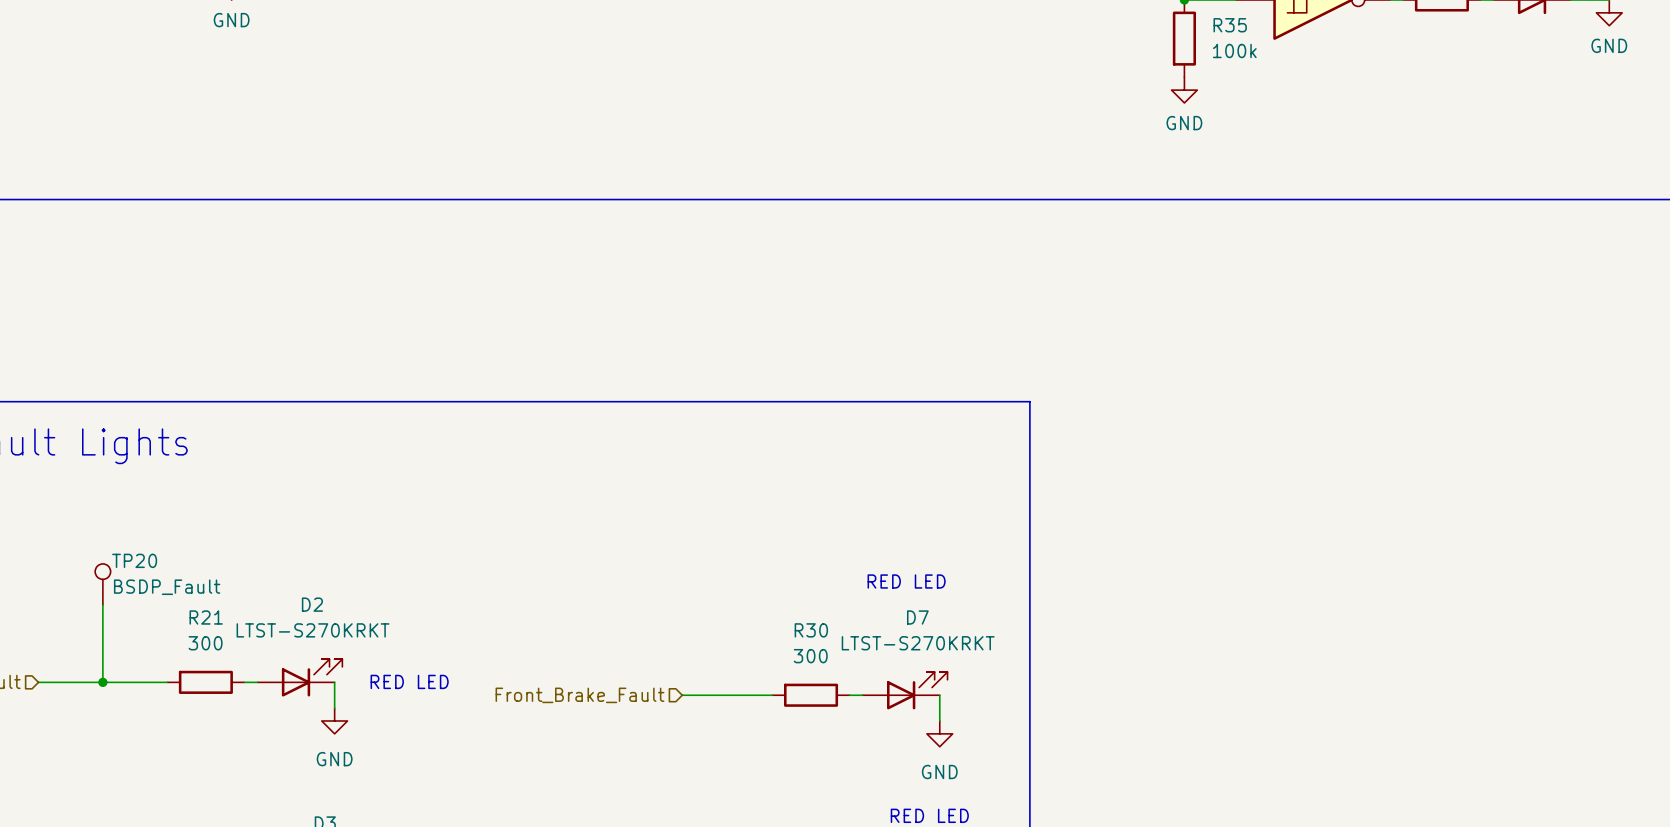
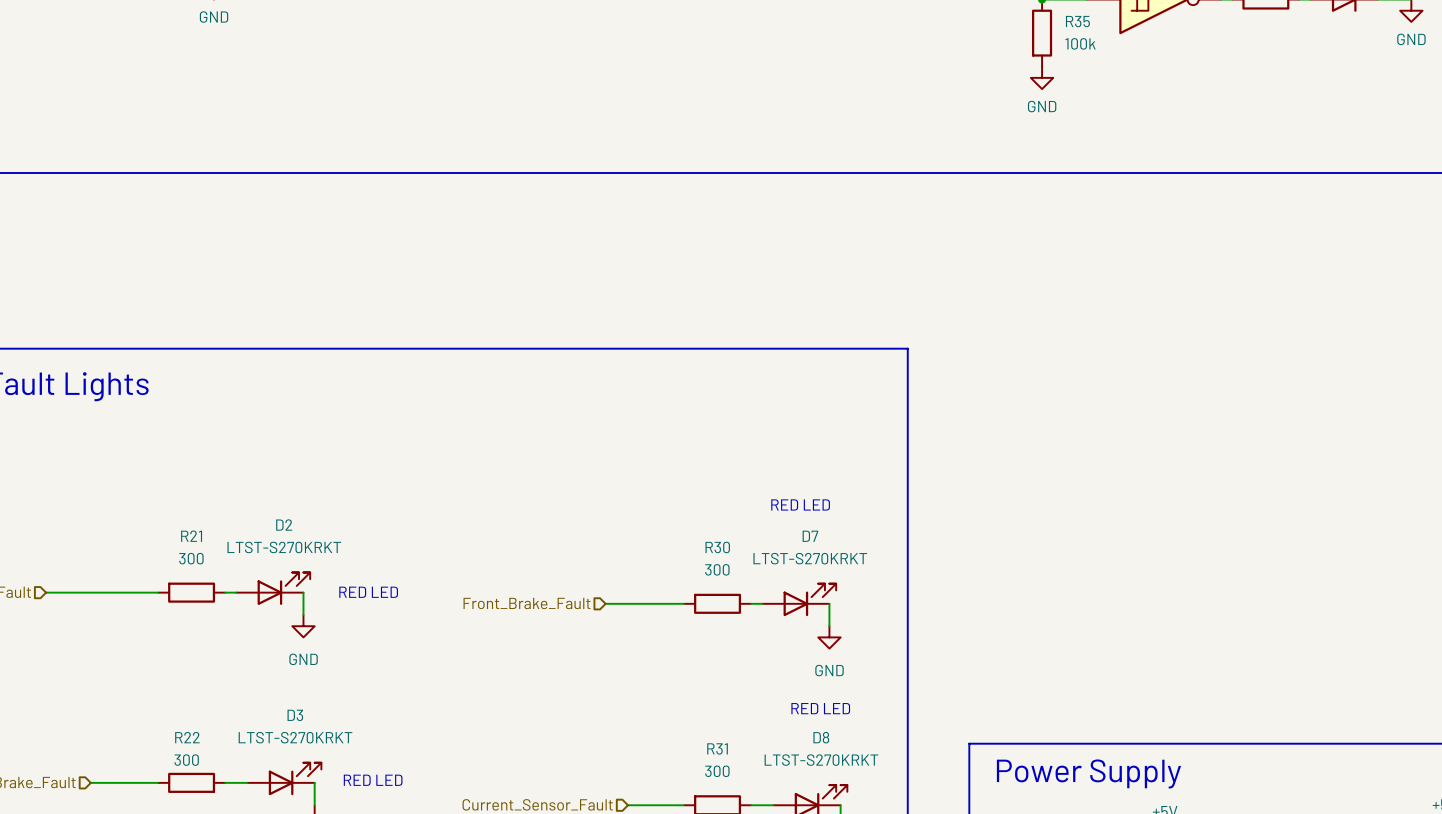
TP20: BSDP_Fault (102, 584) -> none
wire: (102, 605) (102, 682) -> none
junction: (102, 682) -> none

